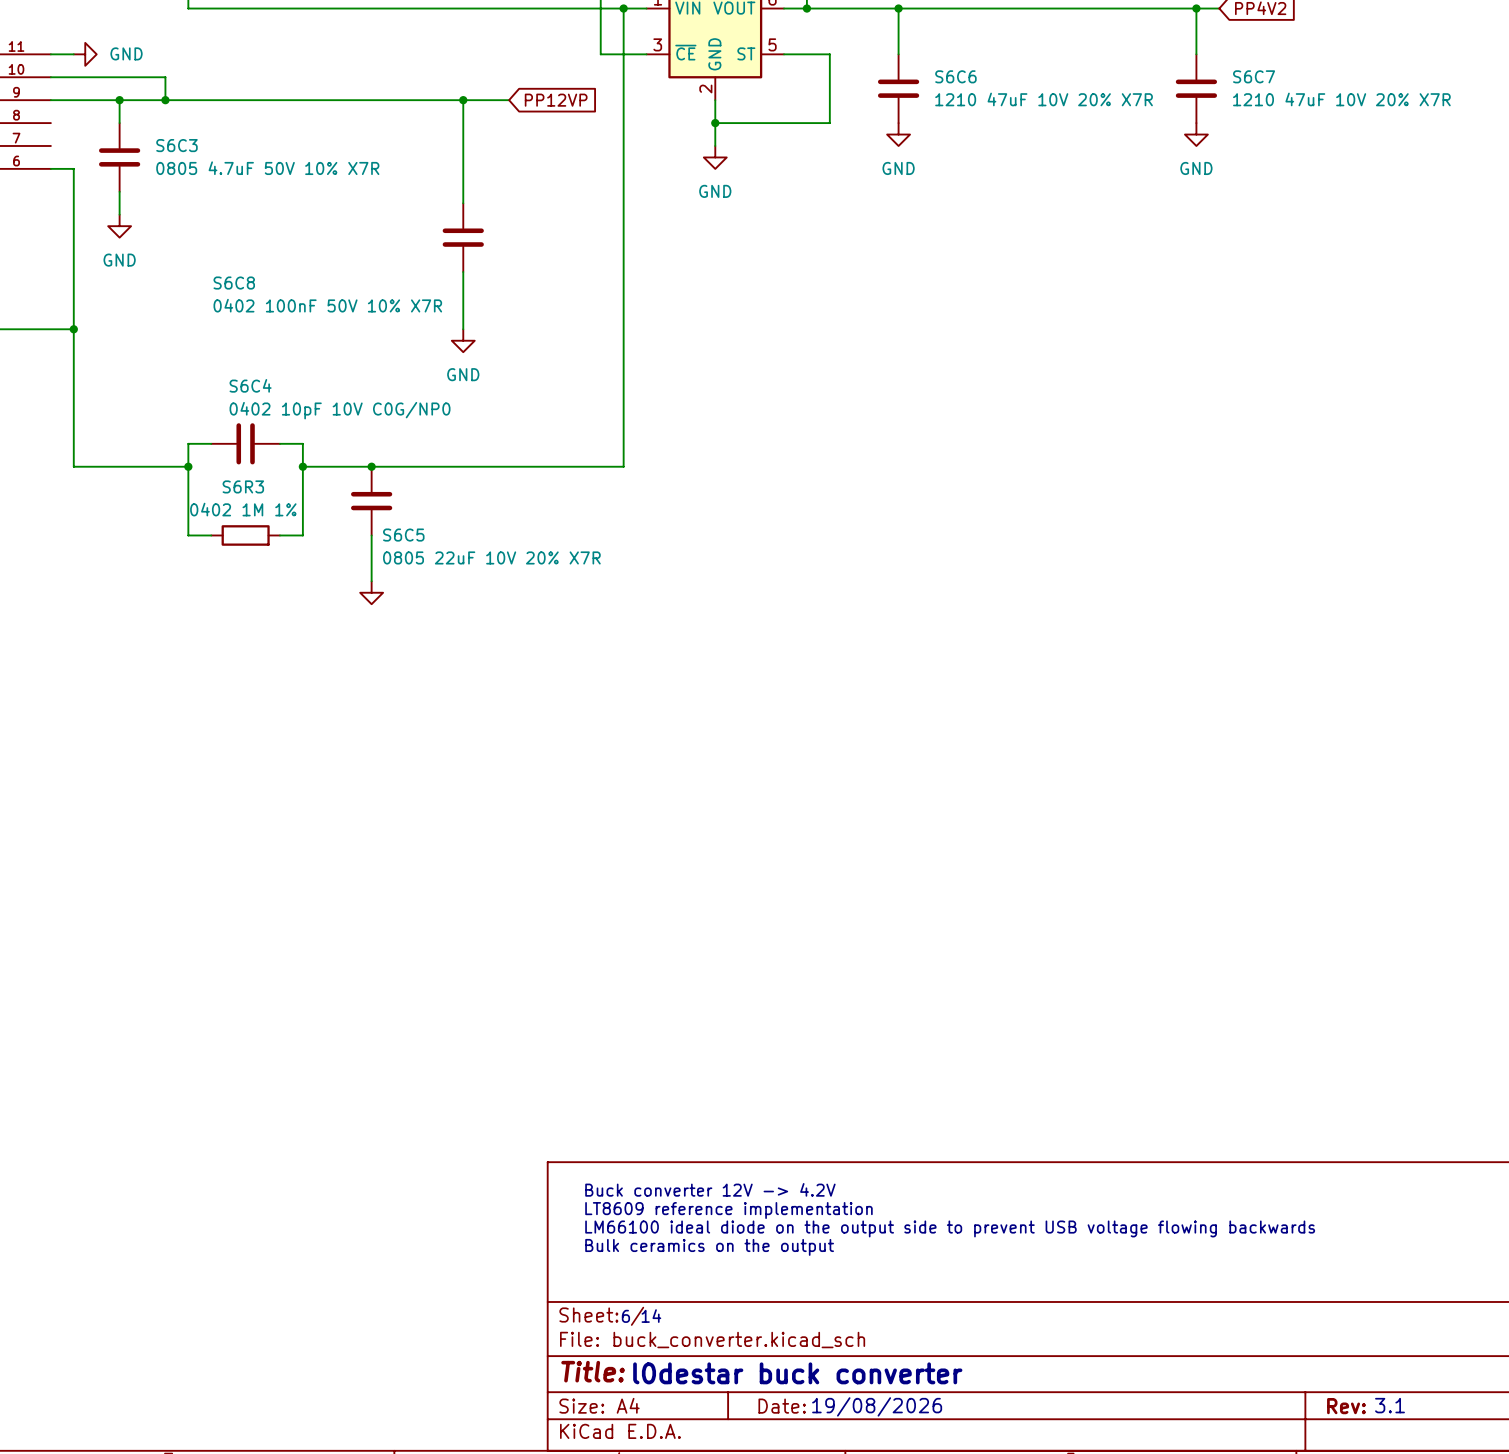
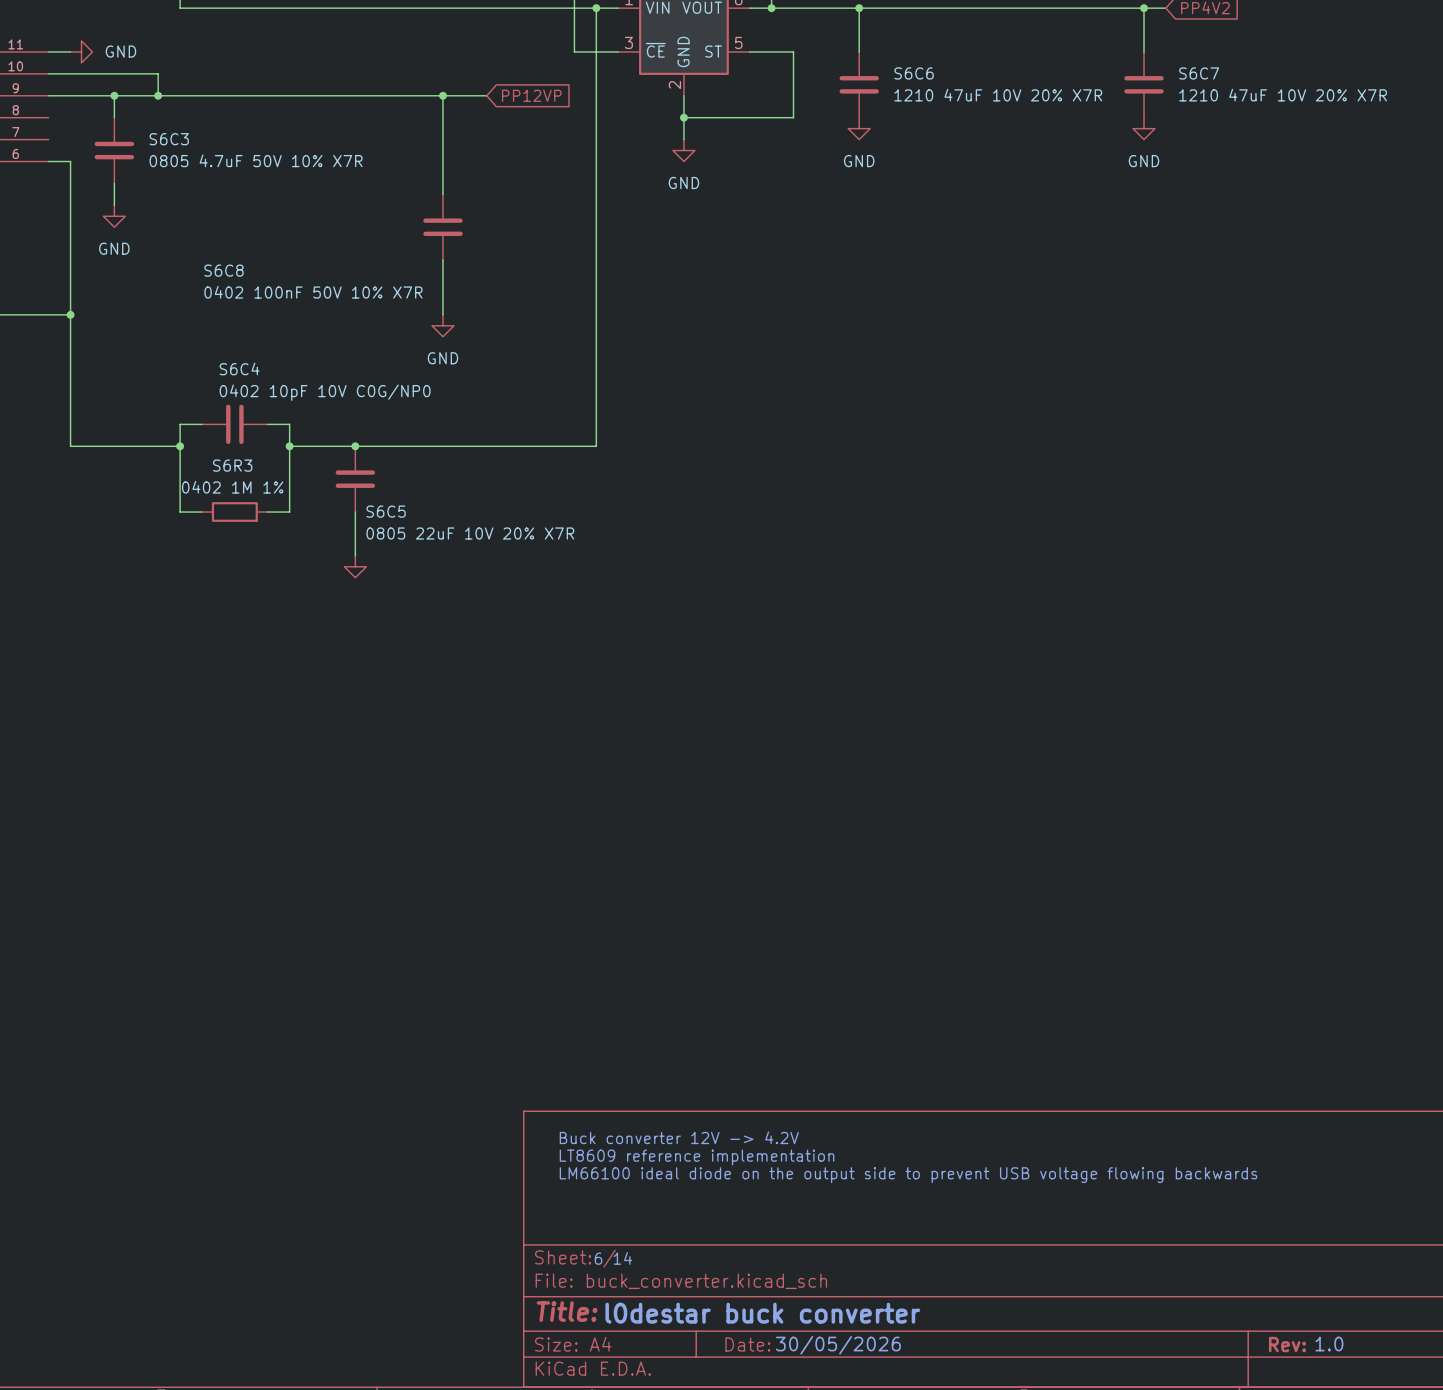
text: Bulk ceramics on the output (709, 1247) -> none
text: 3.1 (1390, 1405) -> 1.0 (1329, 1344)
text: 19/08/2026 (877, 1406) -> 30/05/2026 (838, 1345)

